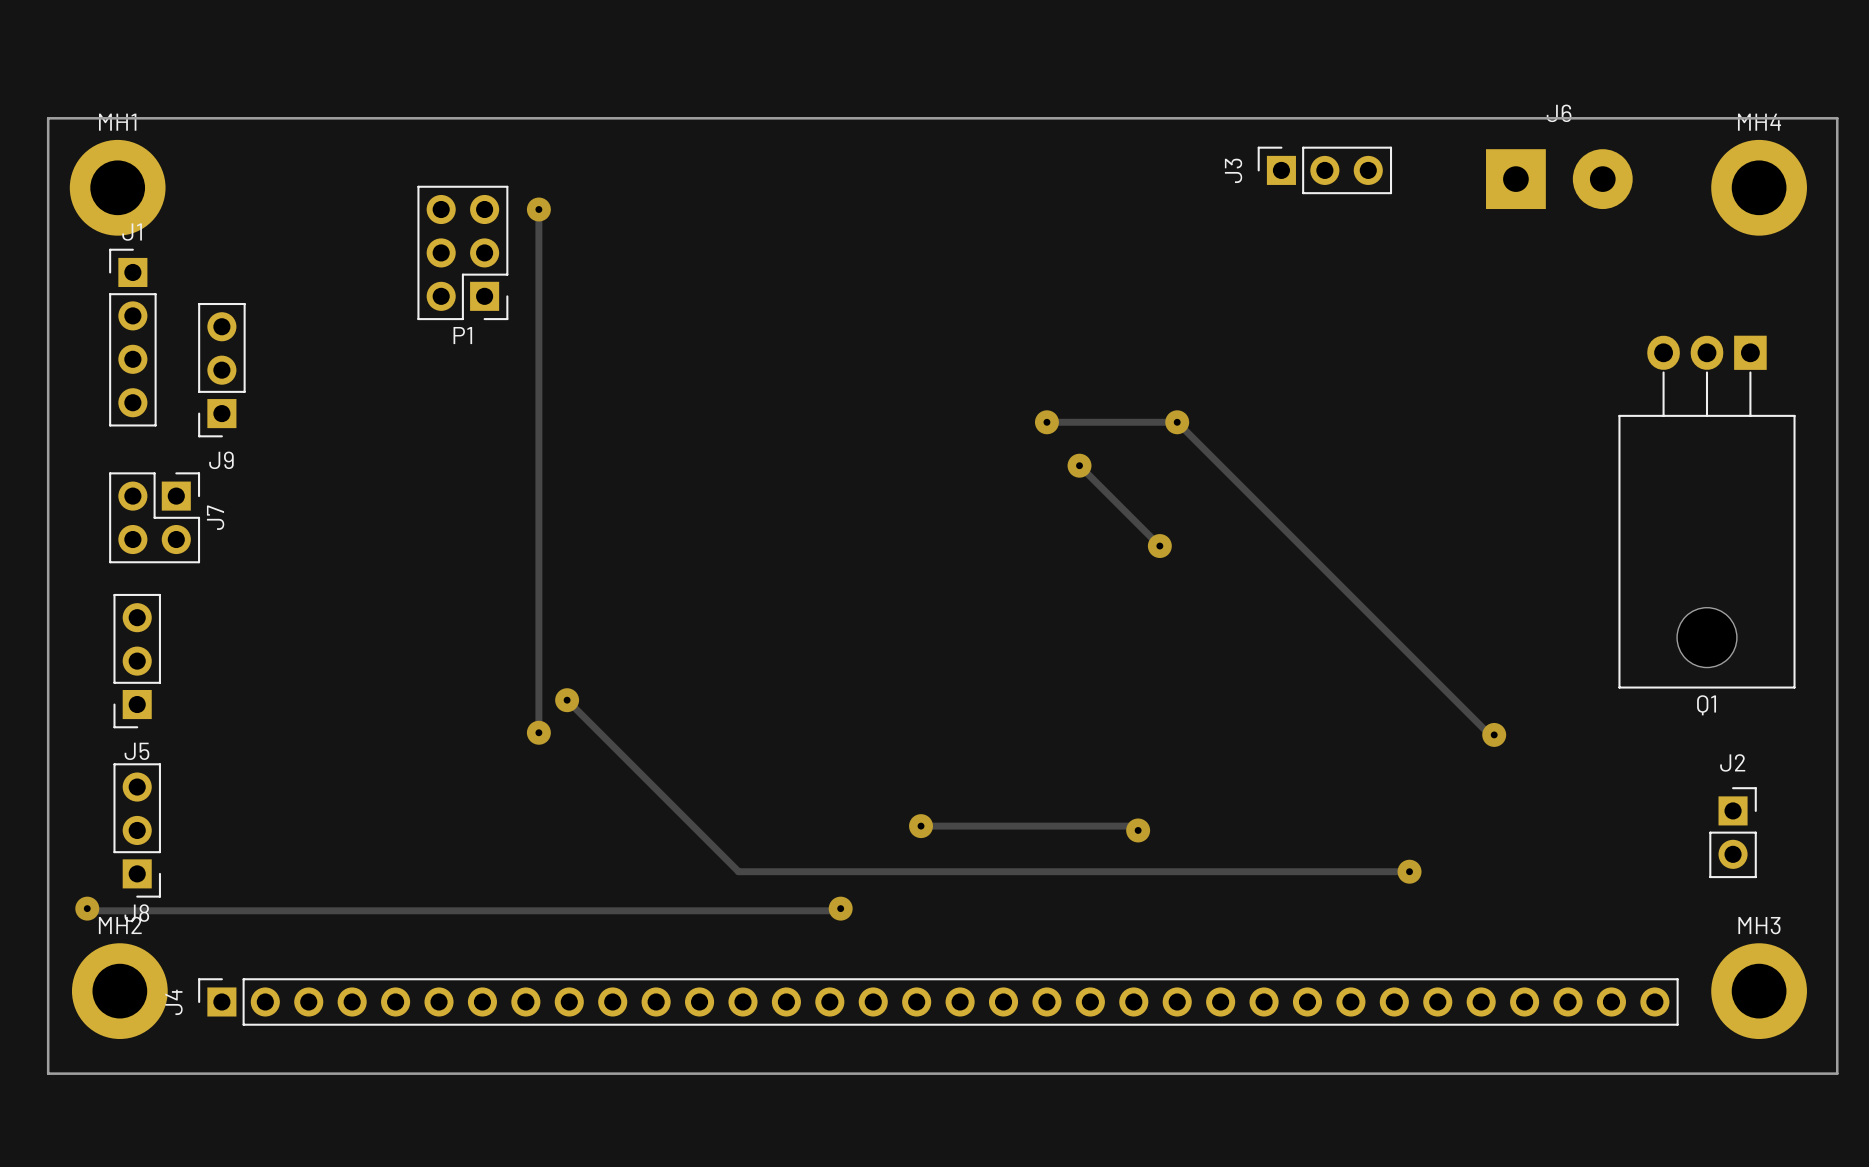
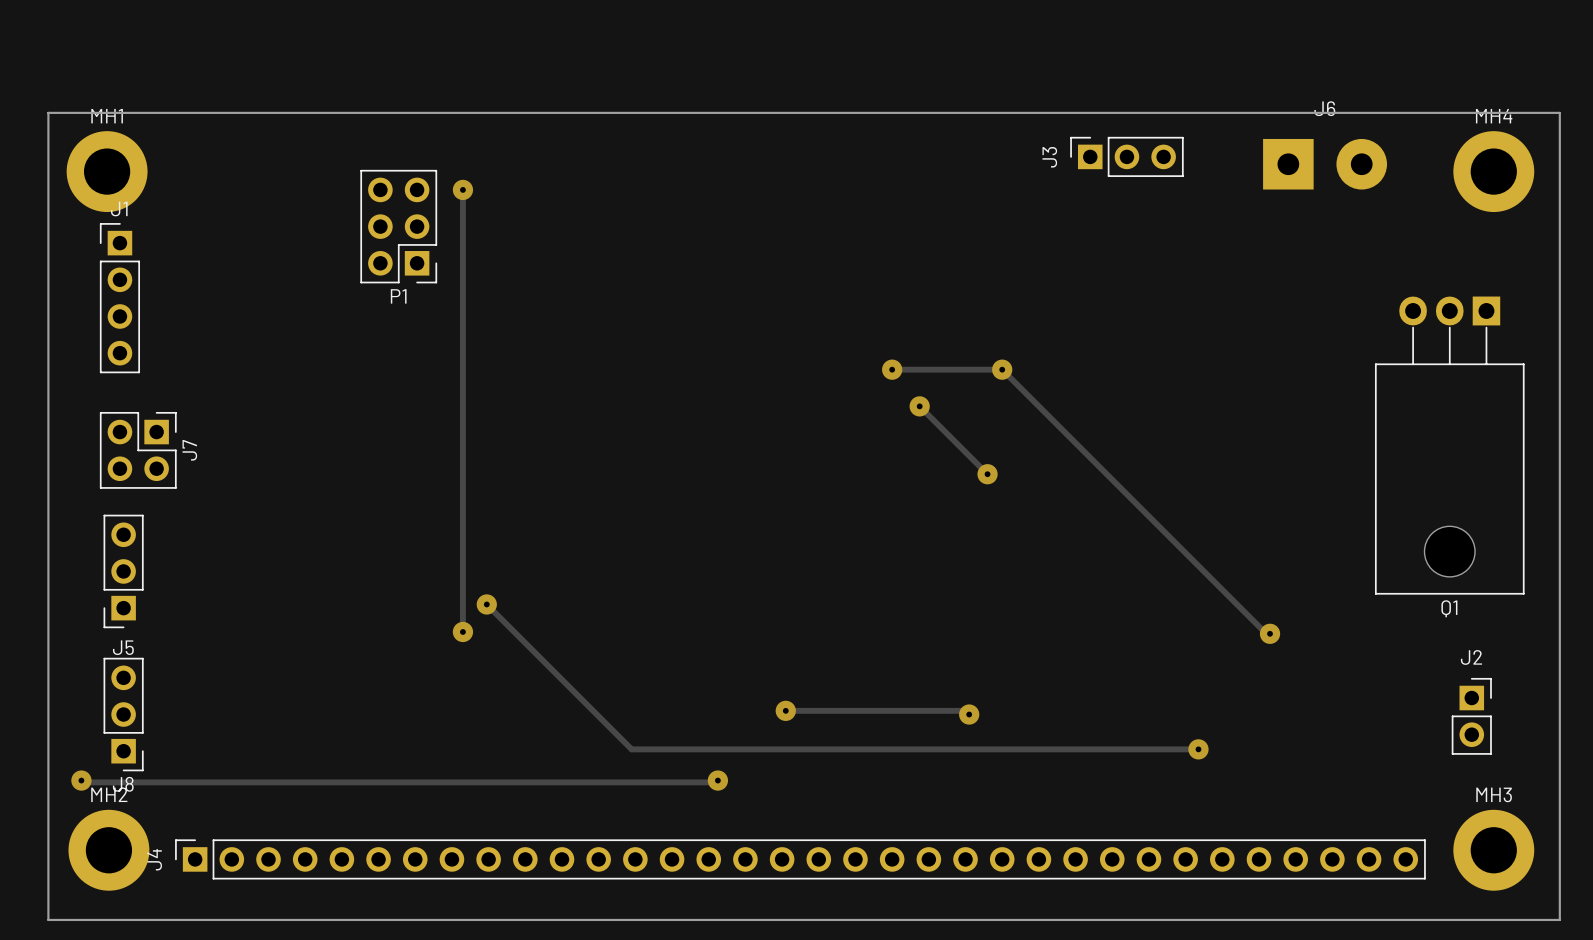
J9: (221, 370) -> none

